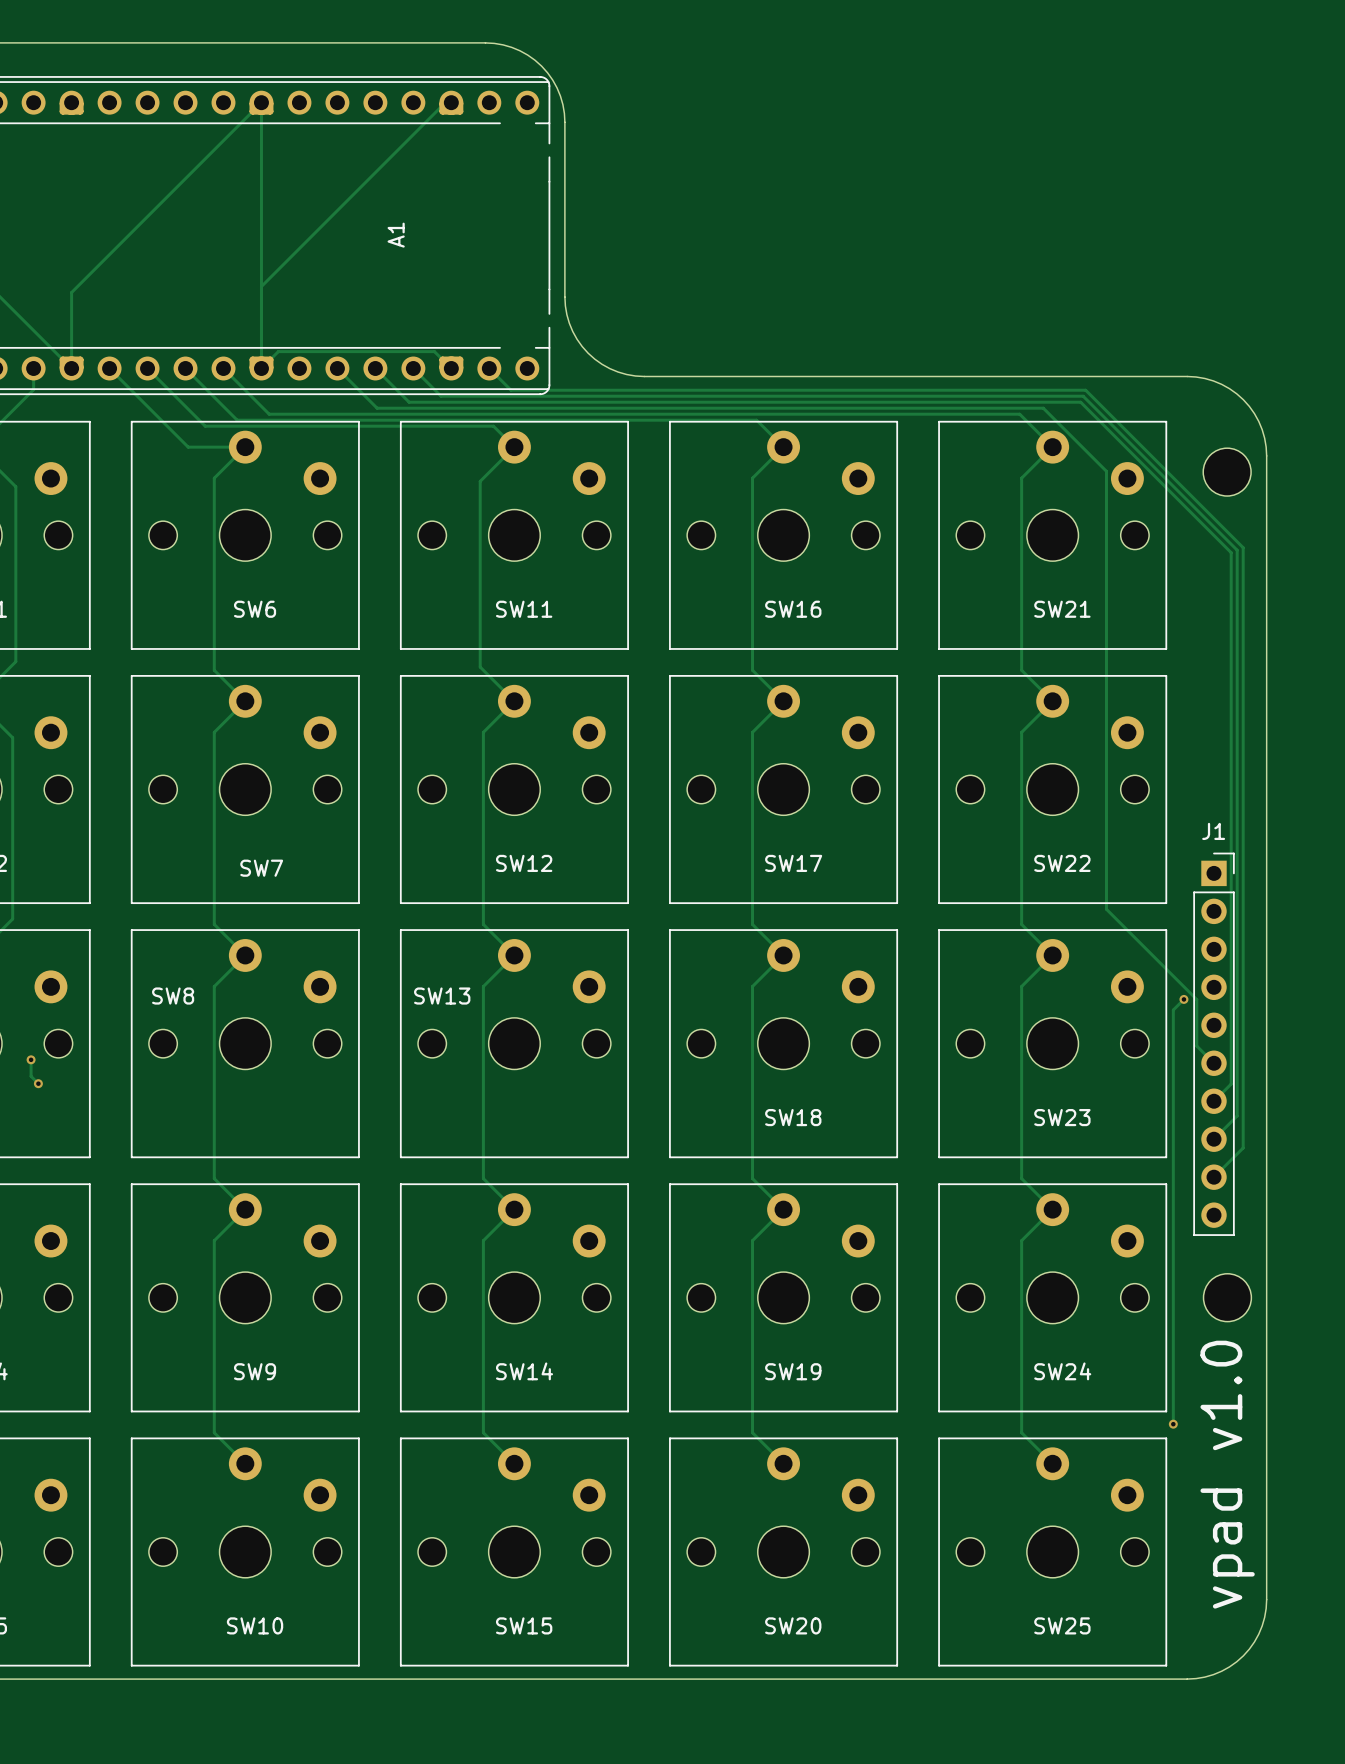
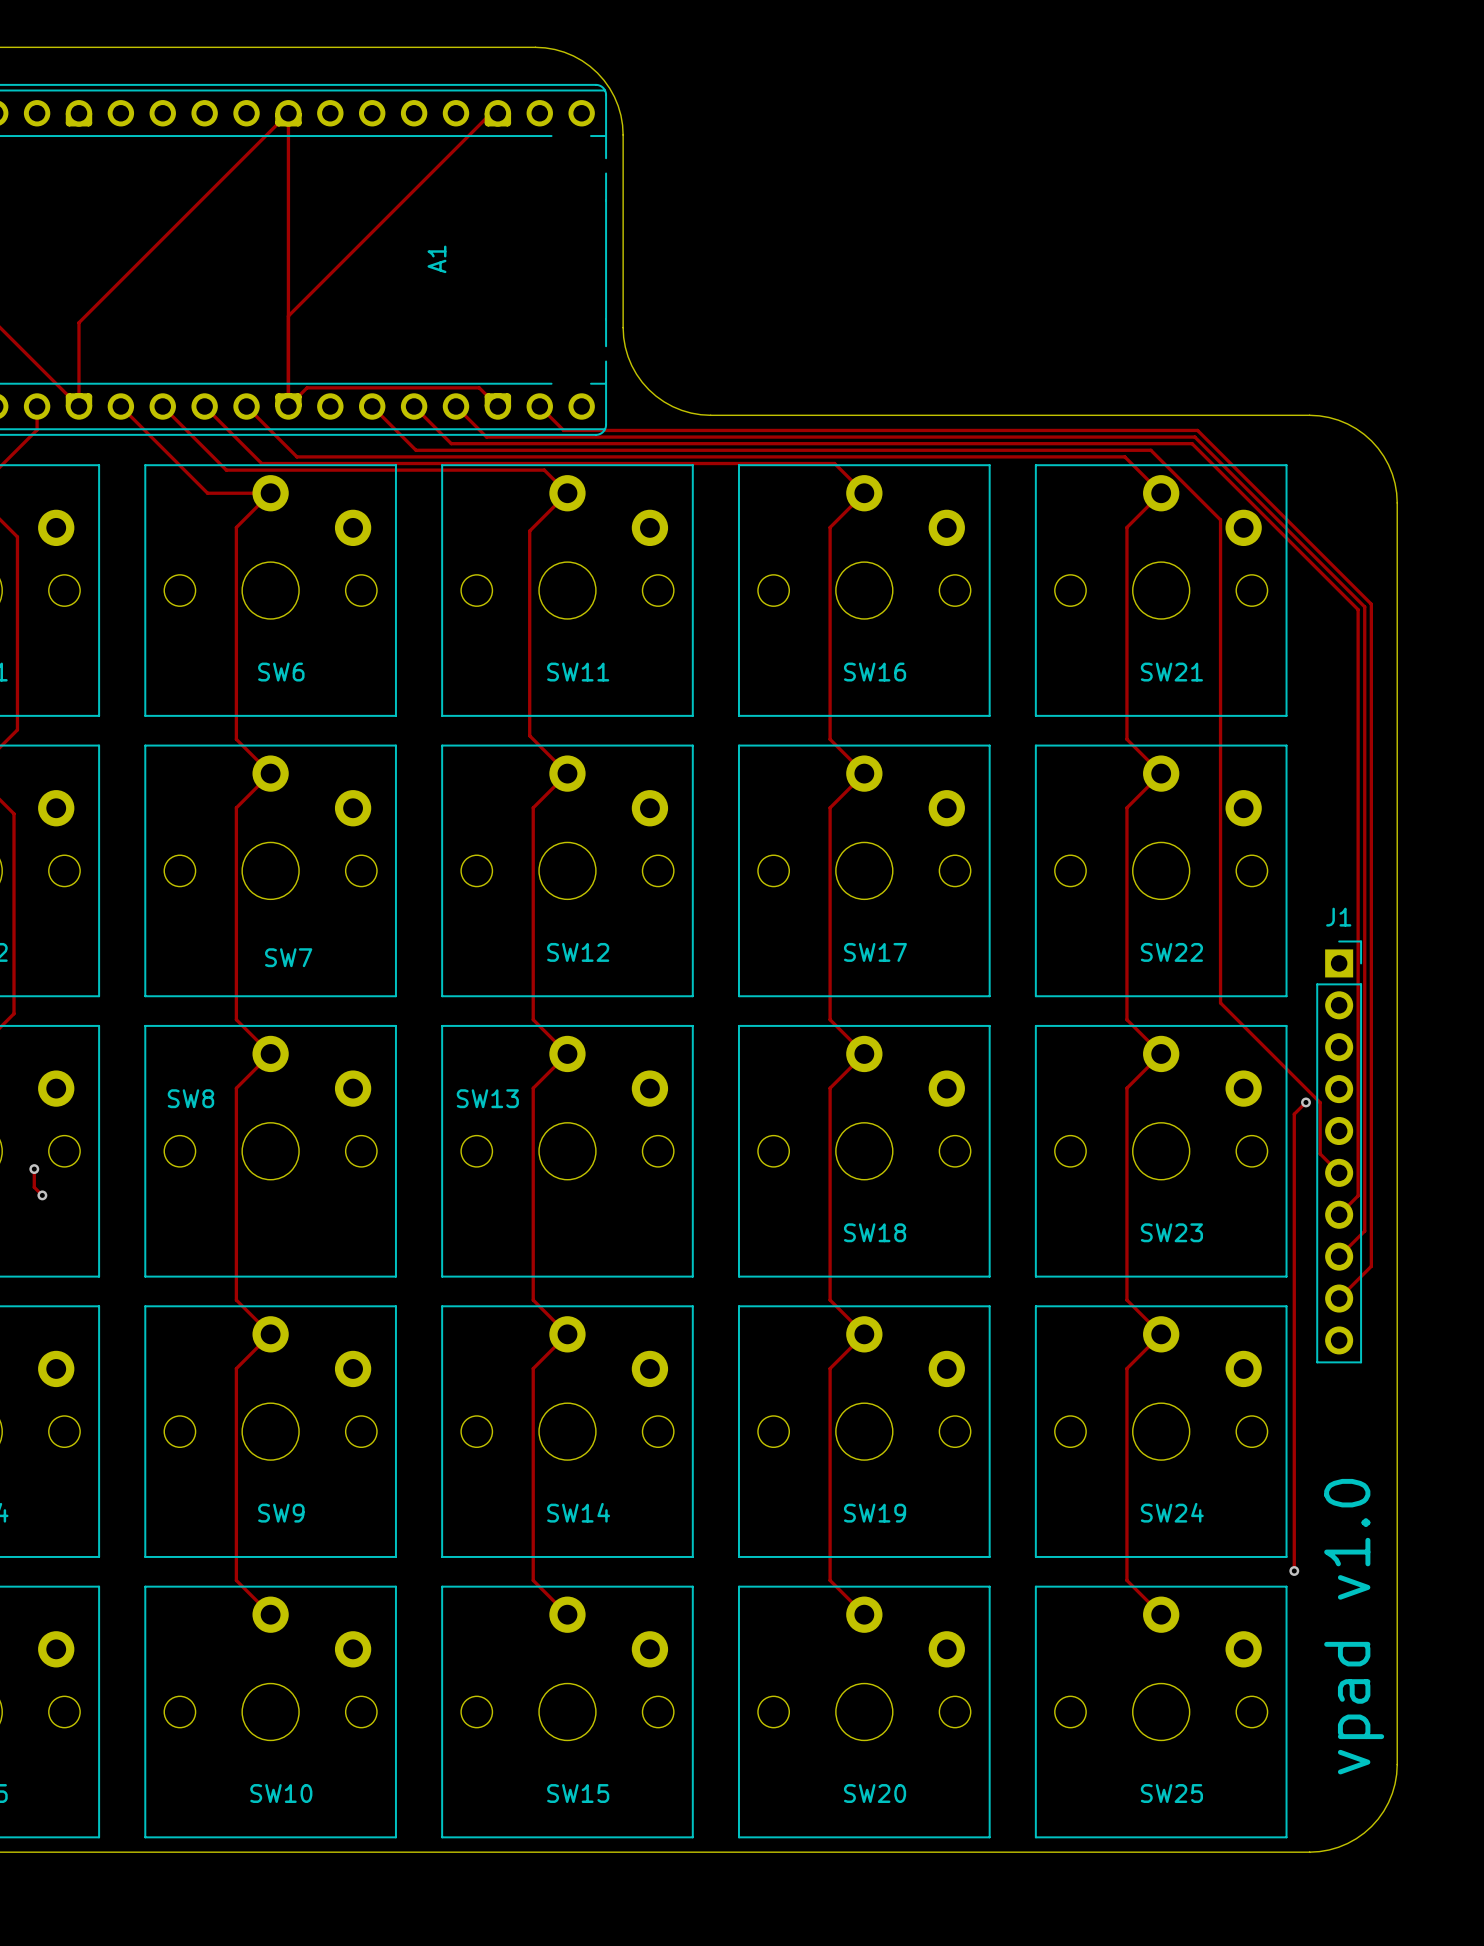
part: (1227, 472) -> none
part: (1227, 1297) -> none

